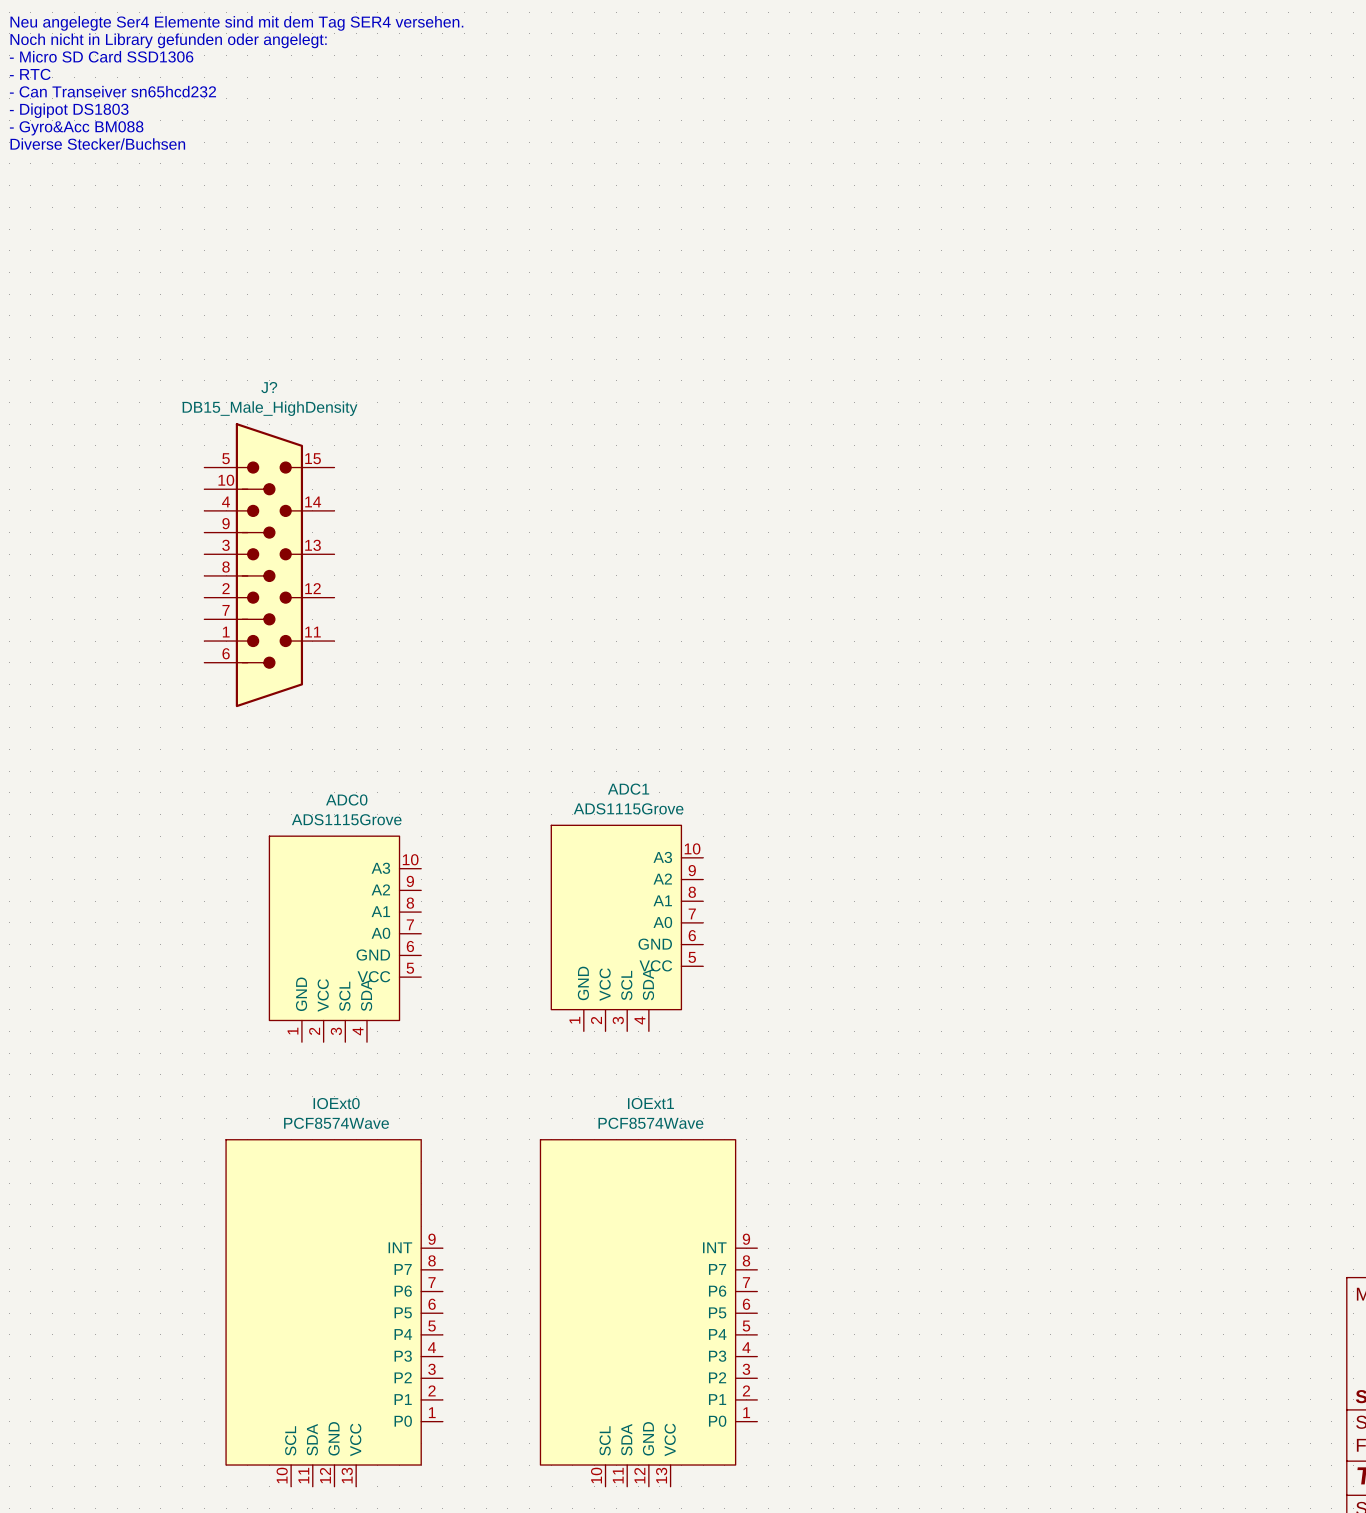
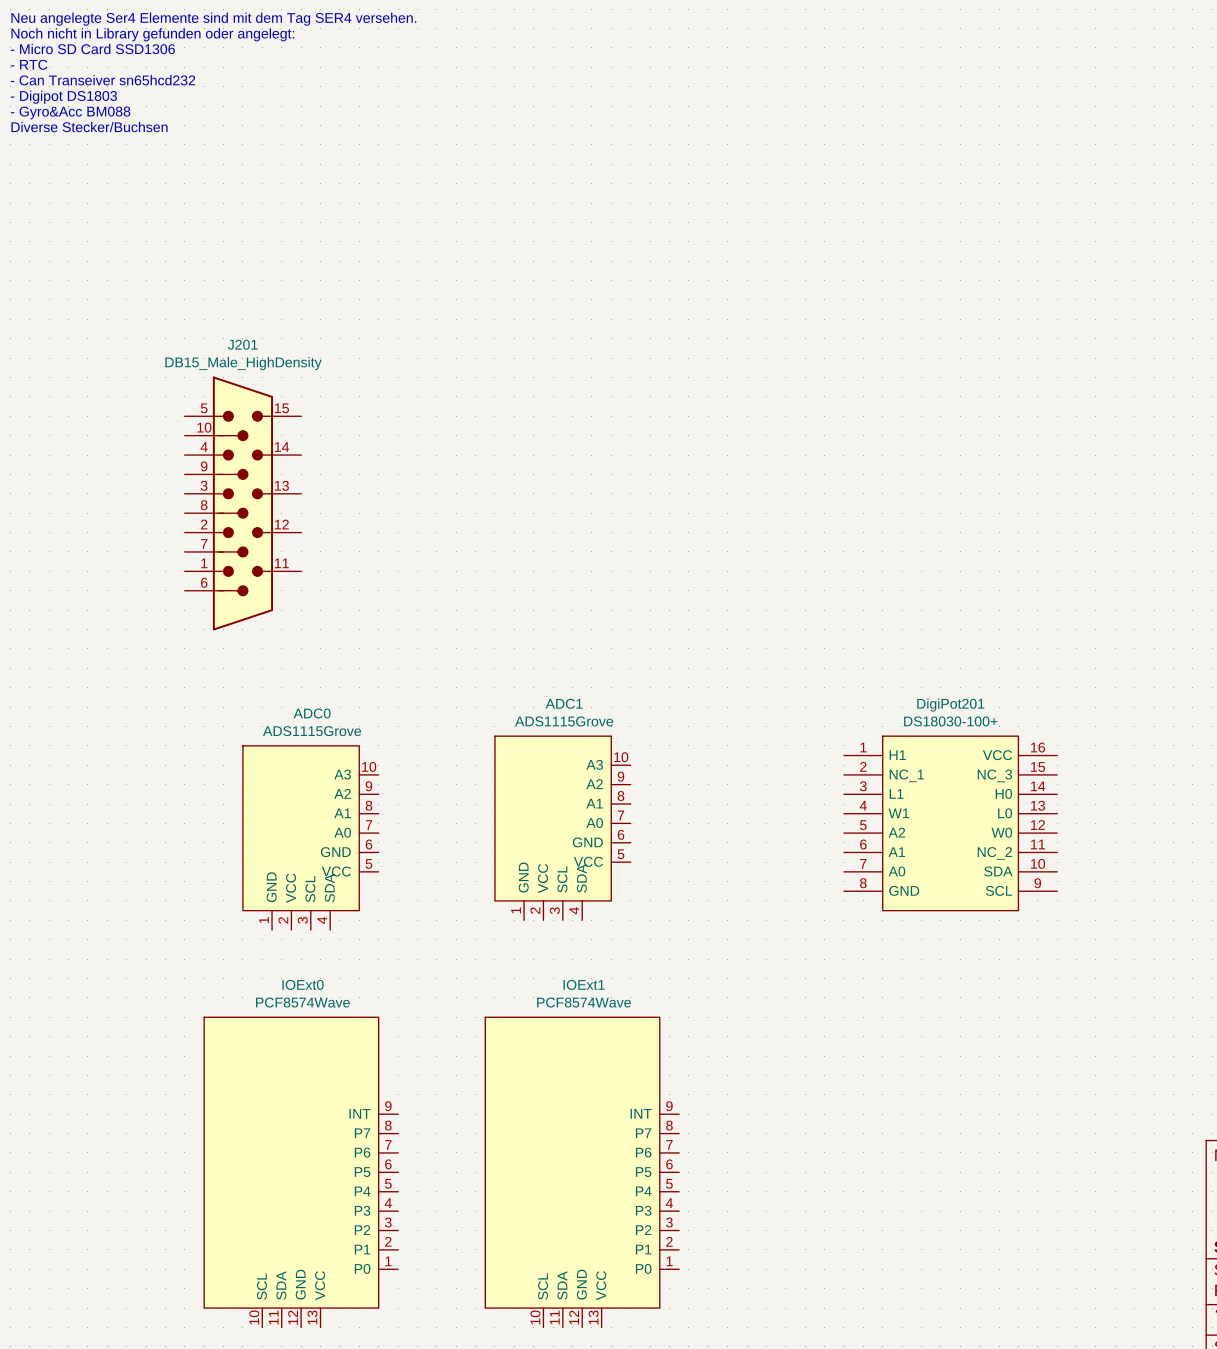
J? name: J? (269, 387) -> J201 (242, 344)
DigiPot201: none -> DS18030-100+ (950, 823)

